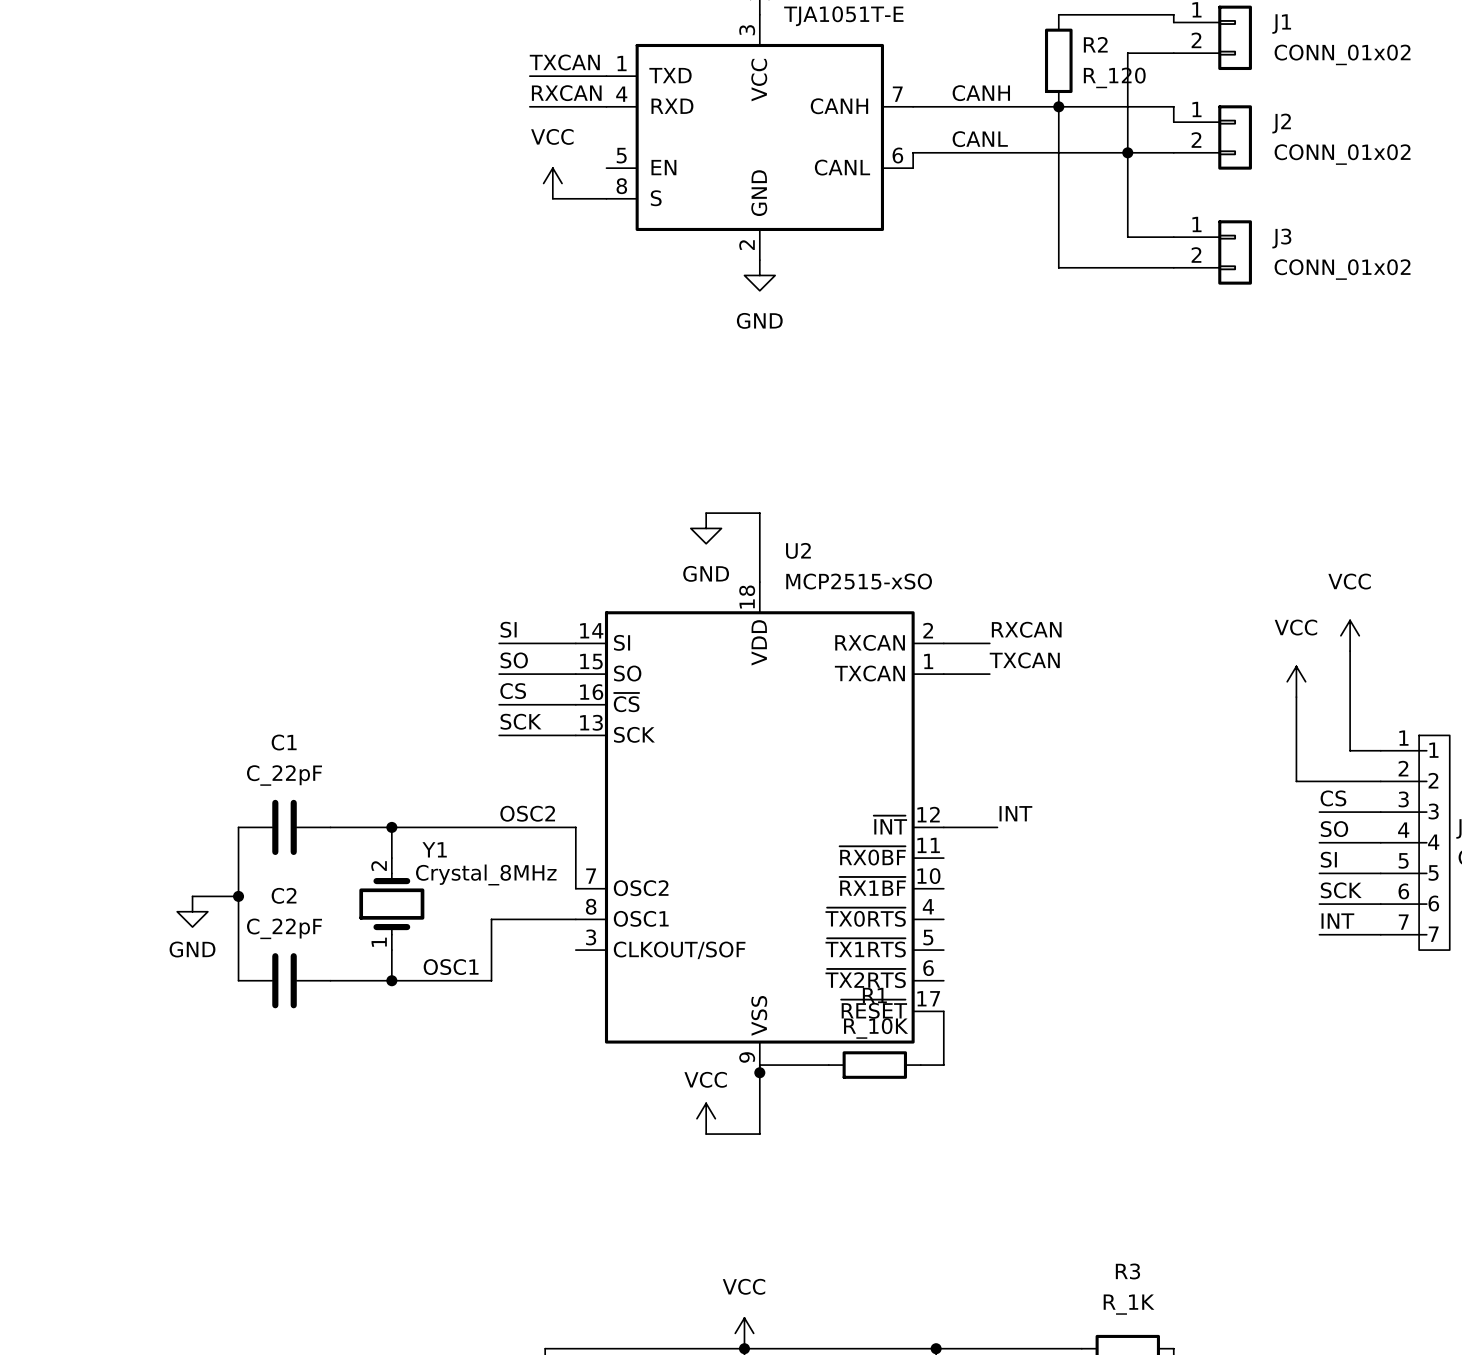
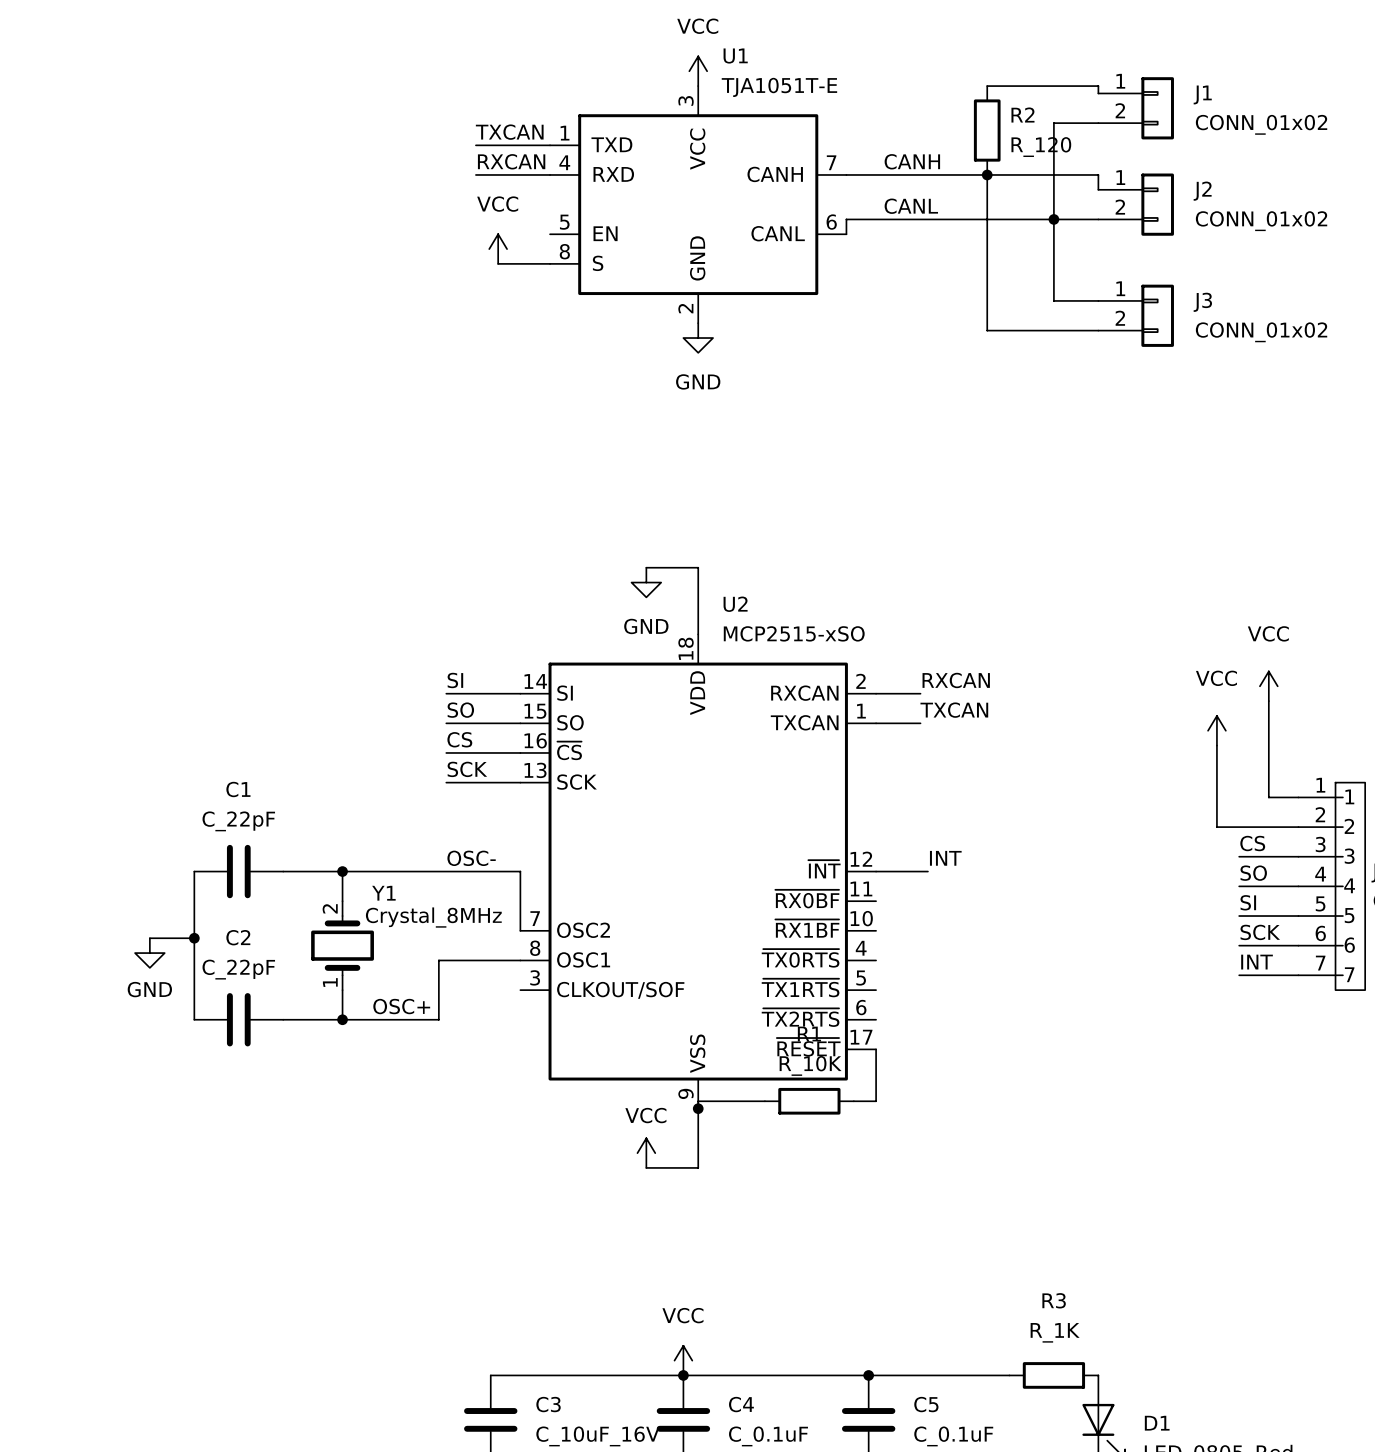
label: OSC2 (527, 813) -> OSC- (471, 858)
label: OSC1 (451, 967) -> OSC+ (401, 1006)

